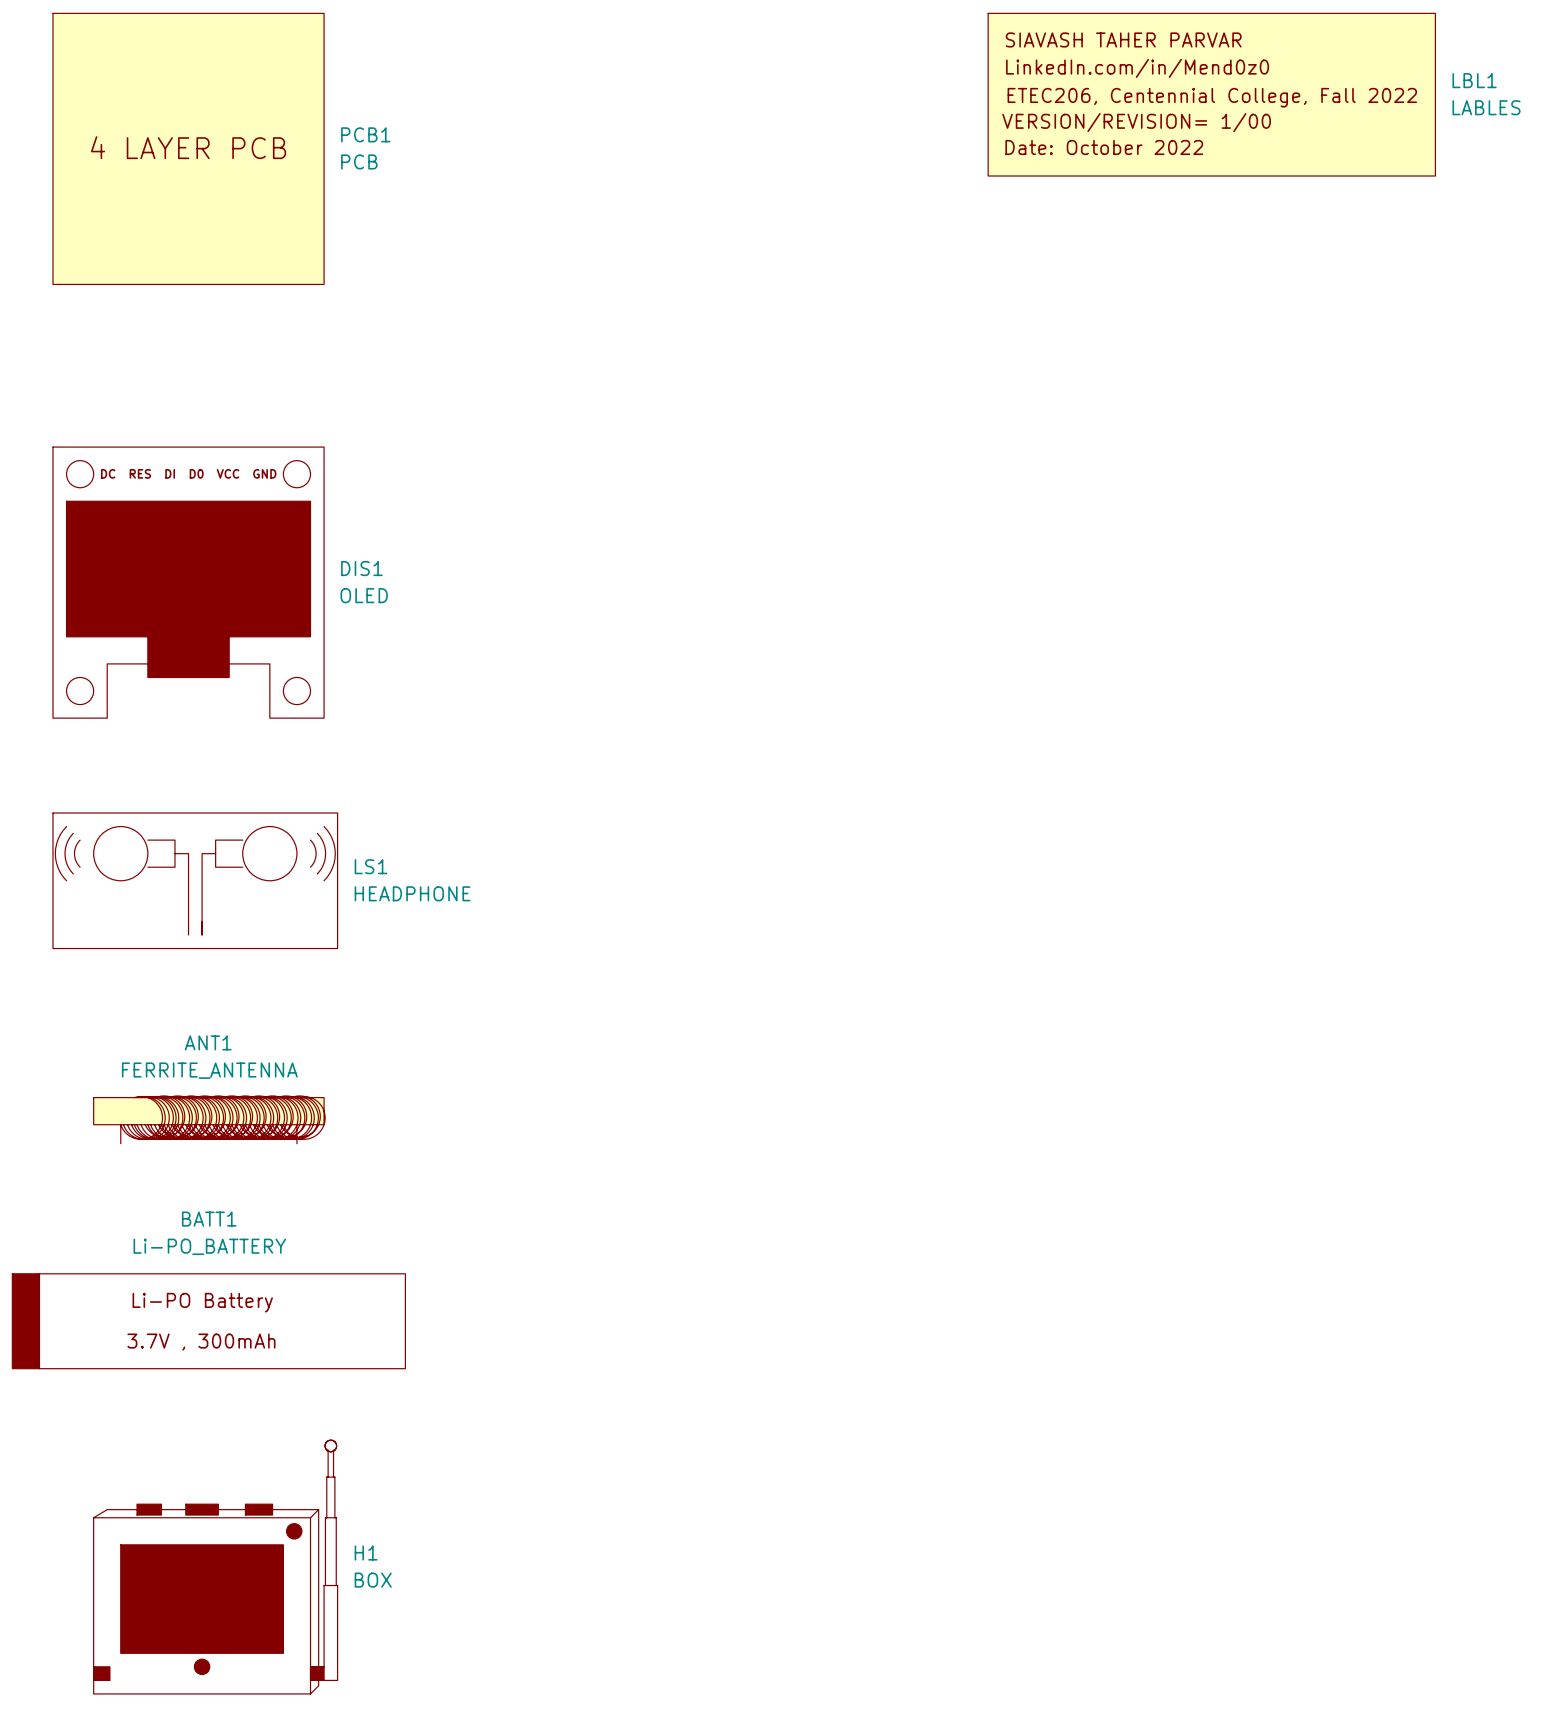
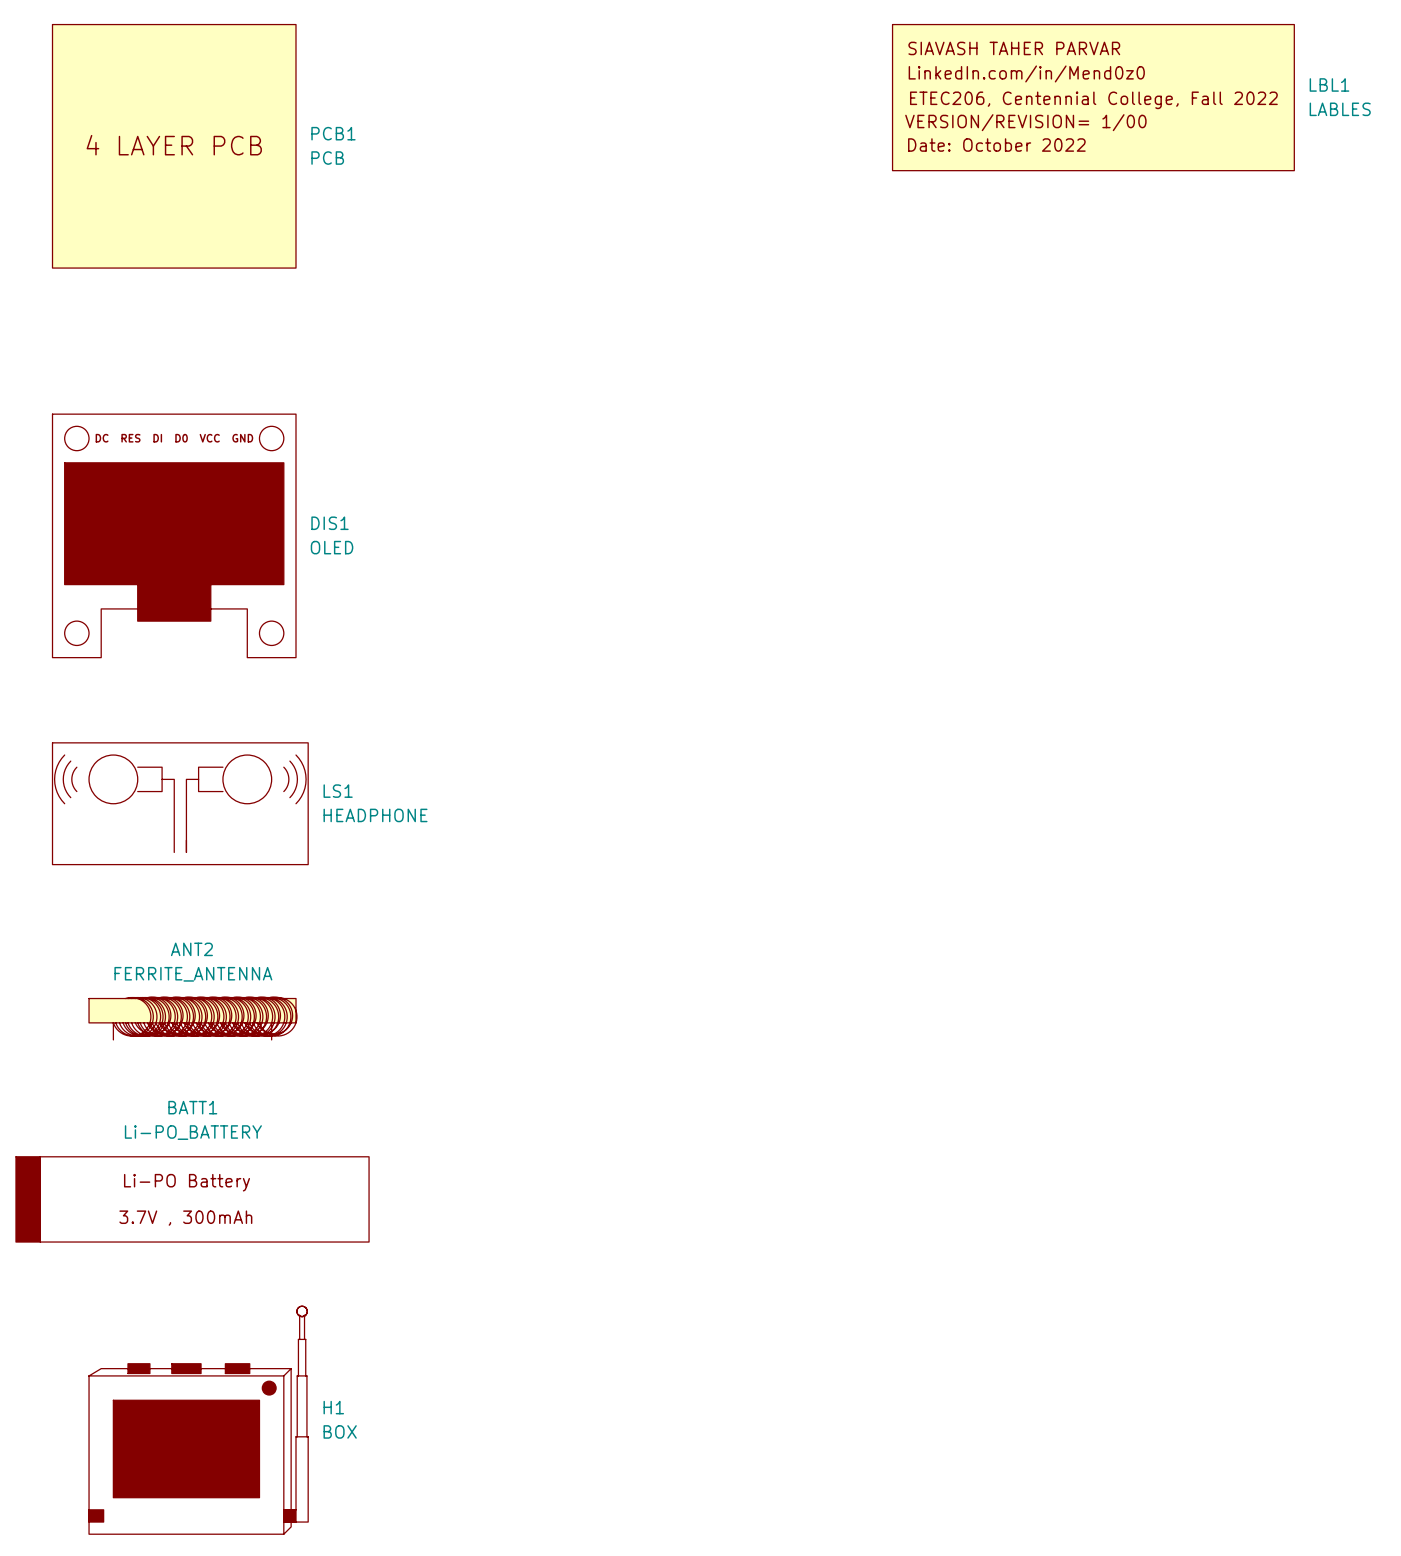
ANT1 name: ANT1 (208, 1042) -> ANT2 (191, 949)
H1 symbol: [93, 1440, 338, 1694] -> [89, 1306, 309, 1535]

